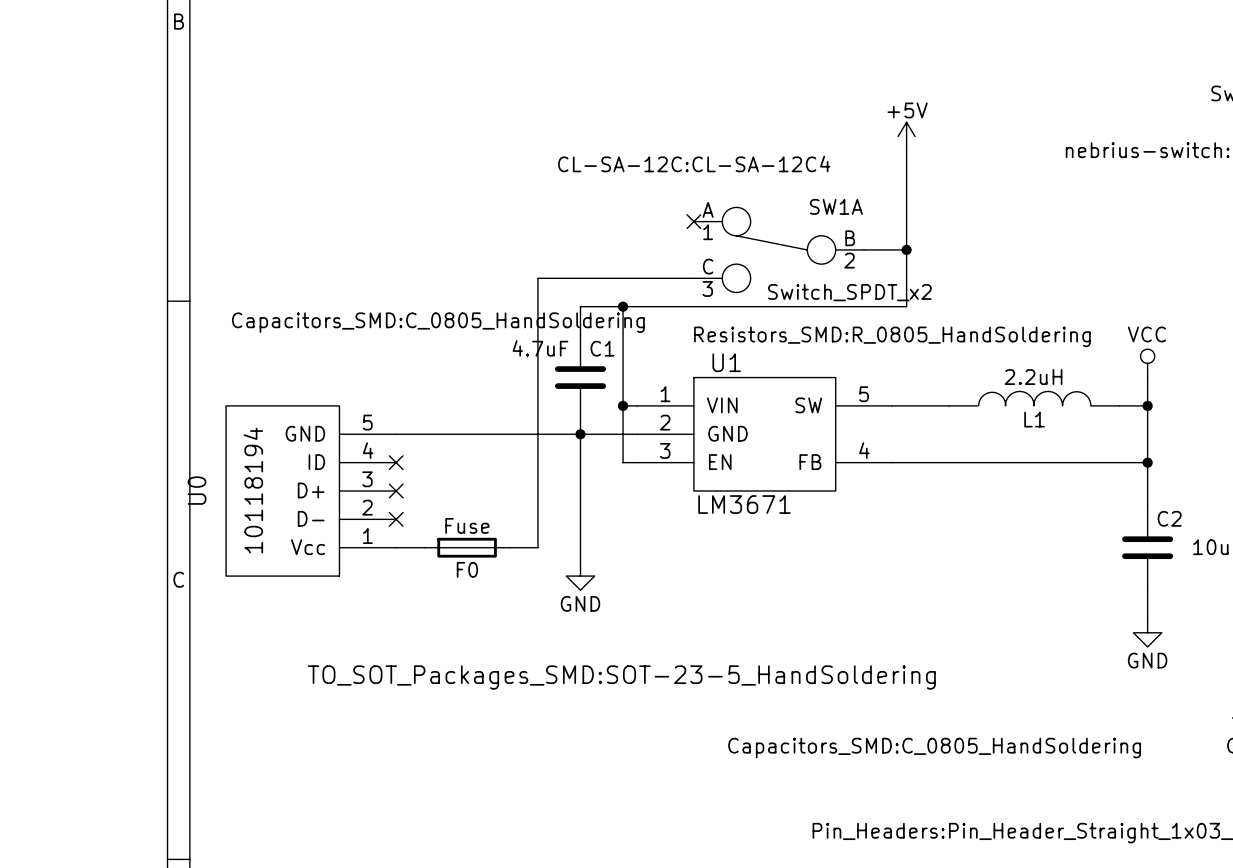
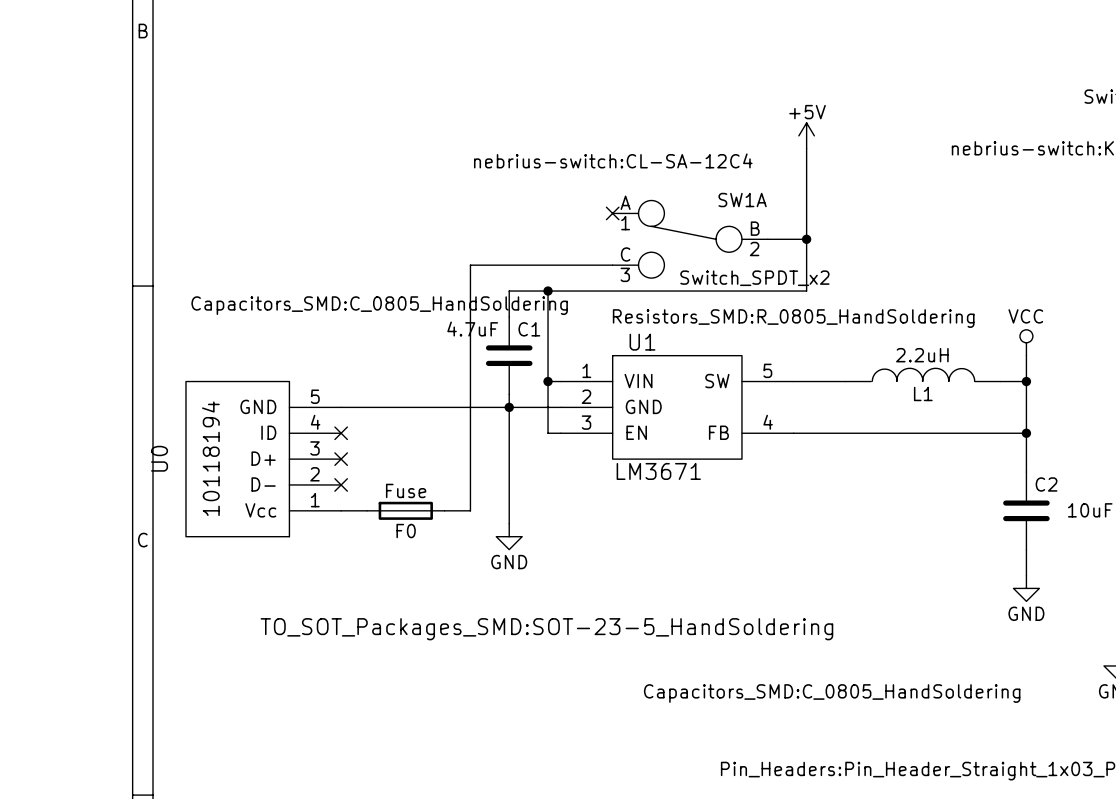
SW1A text: CL-SA-12C:CL-SA-12C4 (694, 164) -> nebrius-switch:CL-SA-12C4 (613, 160)

